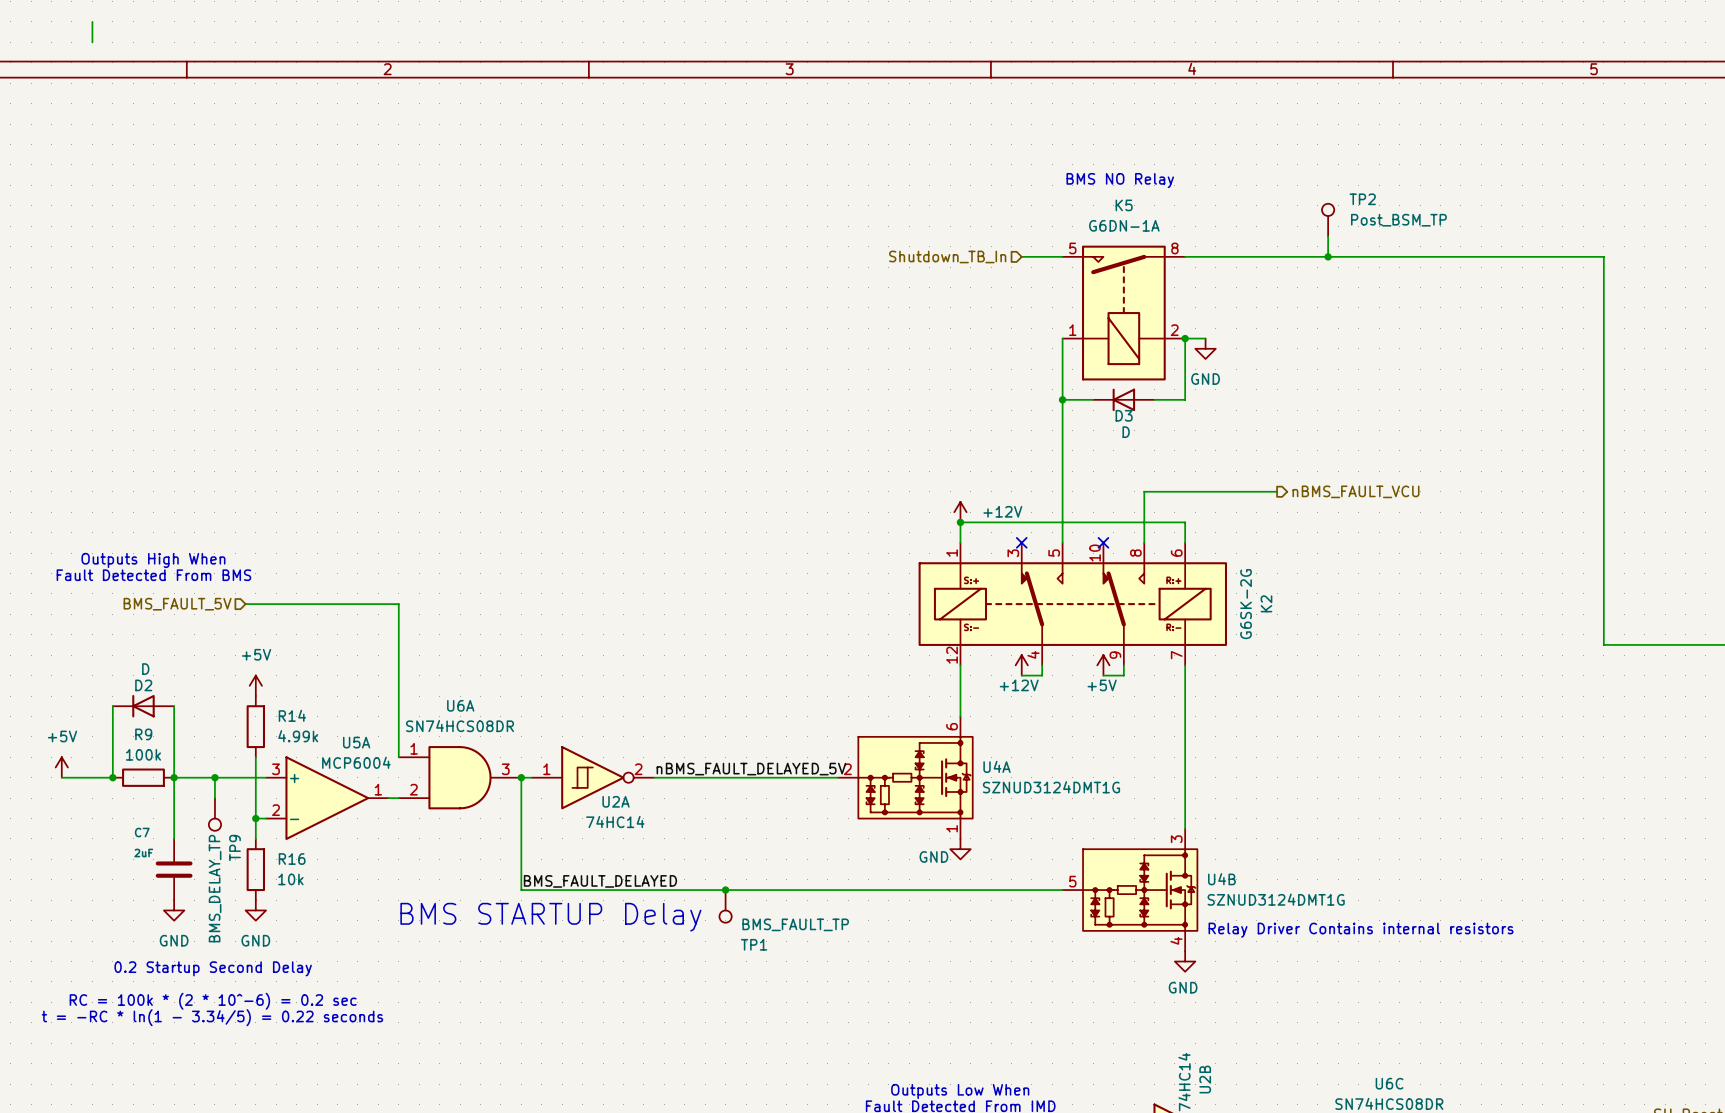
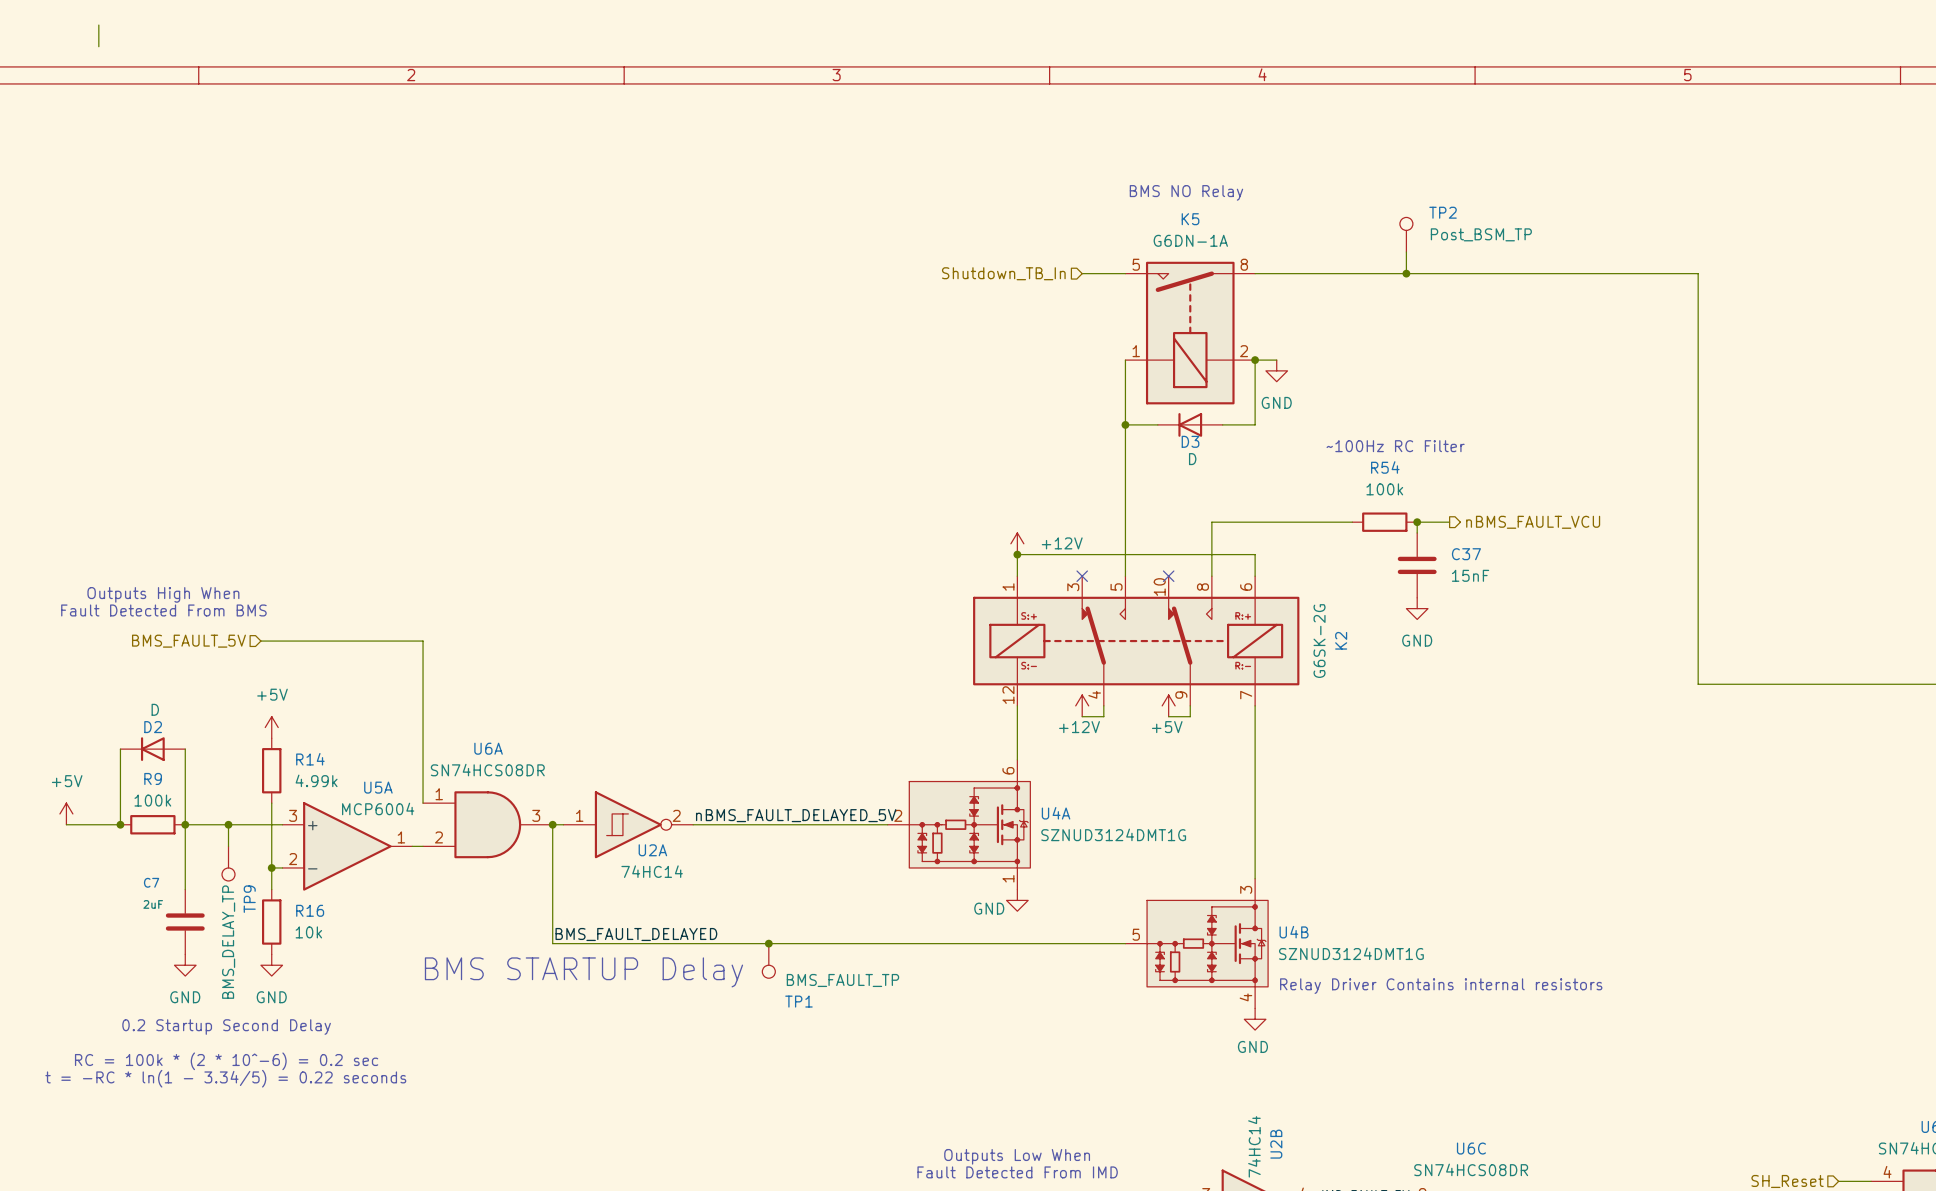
text: none -> ~100Hz RC Filter (1395, 446)
R54: none -> 100k (1384, 522)
junction: none -> (1417, 522)
hierarchical label position: nBMS_FAULT_VCU (1355, 491) -> nBMS_FAULT_VCU (1533, 522)
wire: none -> (1449, 522) (1417, 522) (1417, 532)
C37: none -> 15nF (1417, 565)
power symbol: none -> GND (1417, 608)

